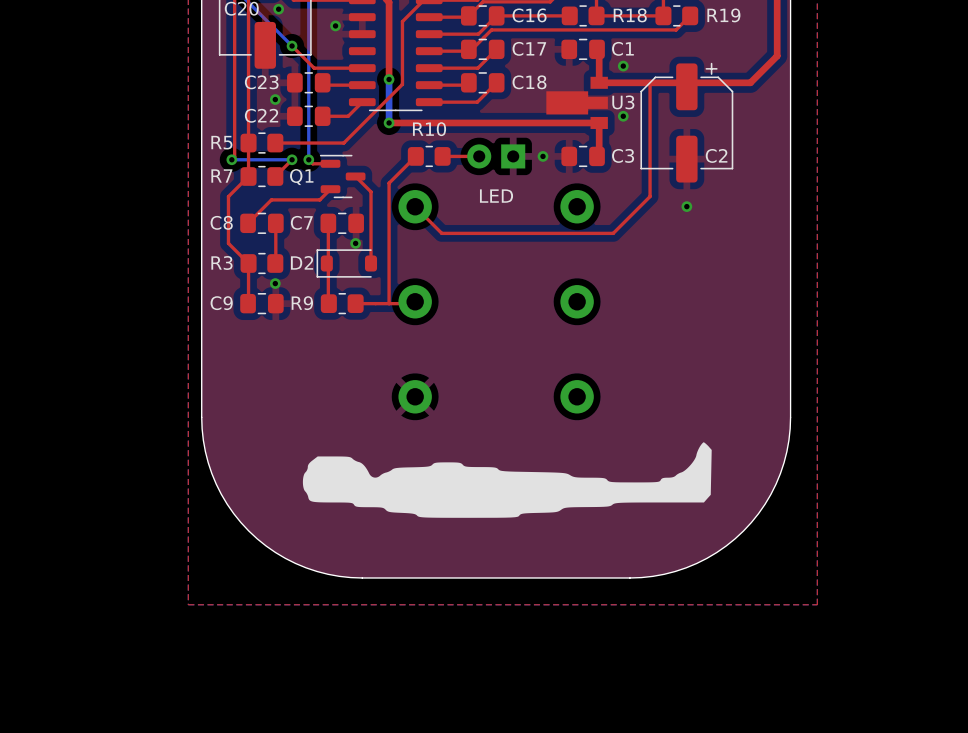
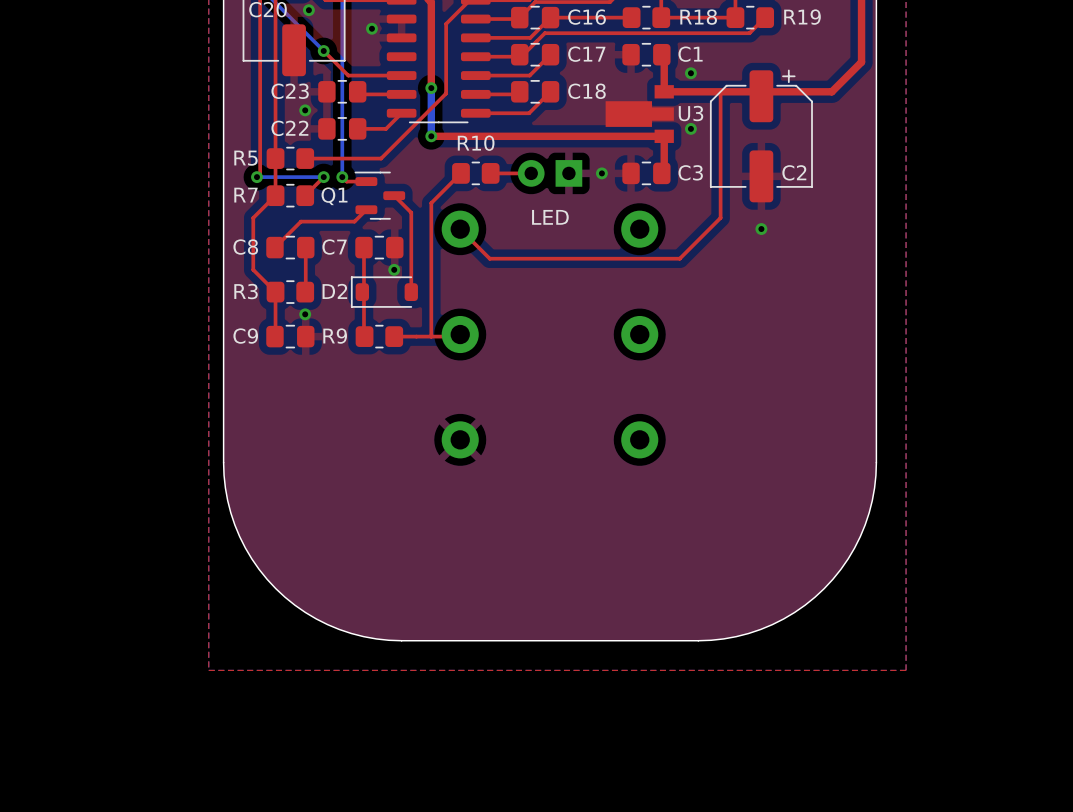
drawing: [302, 442, 712, 518] -> none

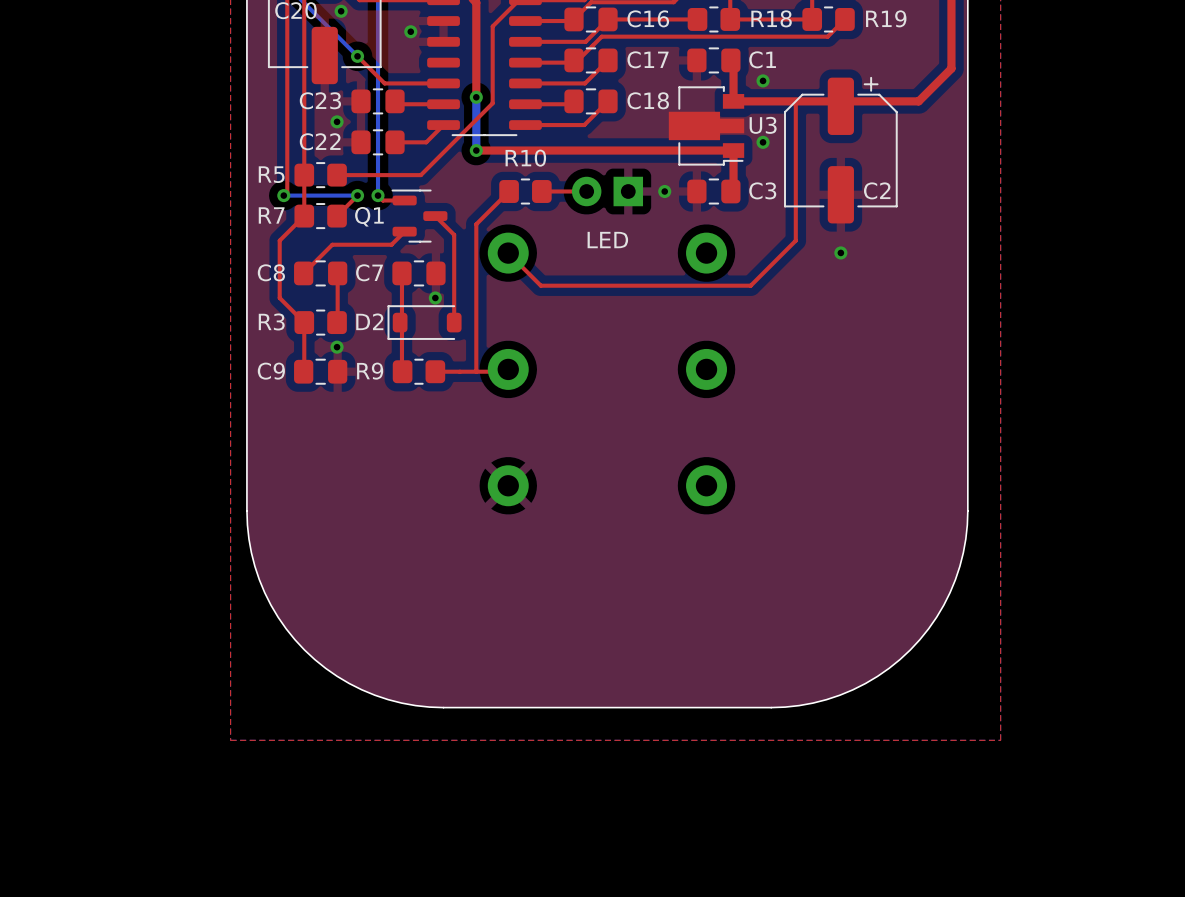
U3 footprint: [605, 85, 674, 143] -> [668, 86, 745, 166]

